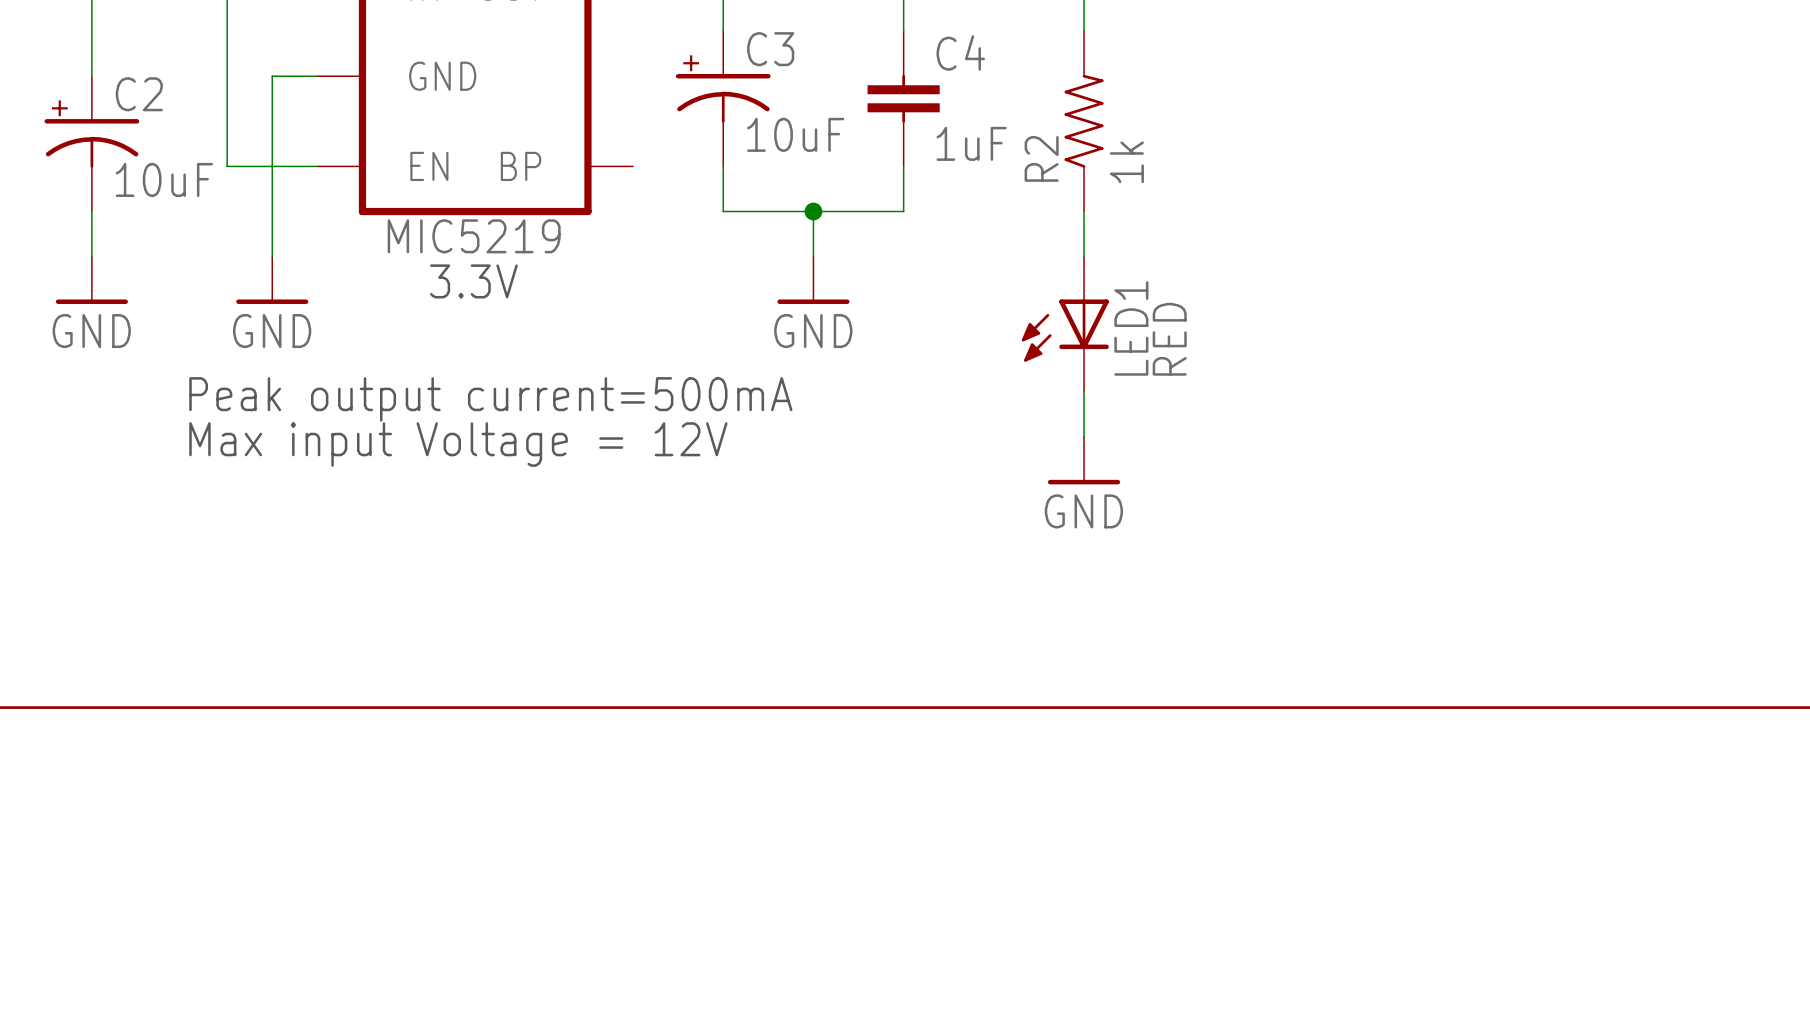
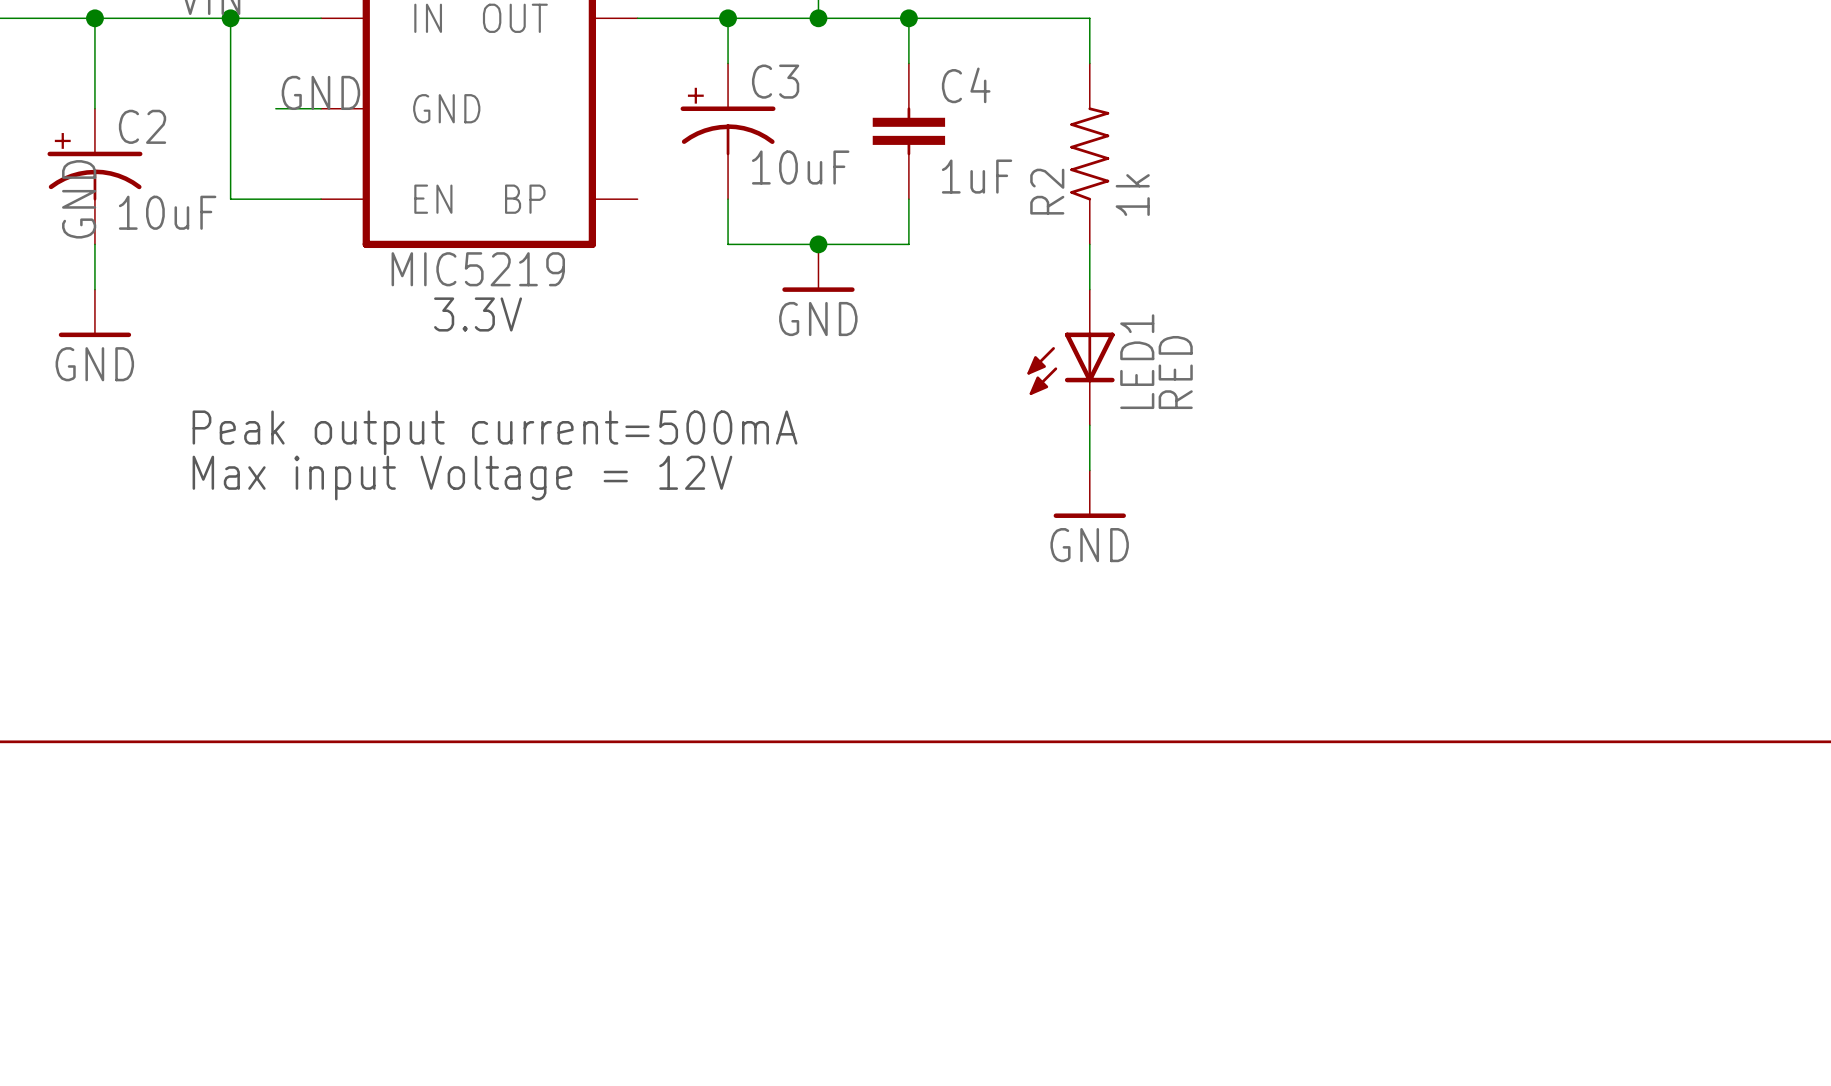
label: none -> GND (320, 92)
wire: (272, 76) (272, 256) -> none
label: none -> GND (79, 199)
power symbol: GND (272, 280) -> none
power symbol position: GND (813, 280) -> GND (818, 268)

